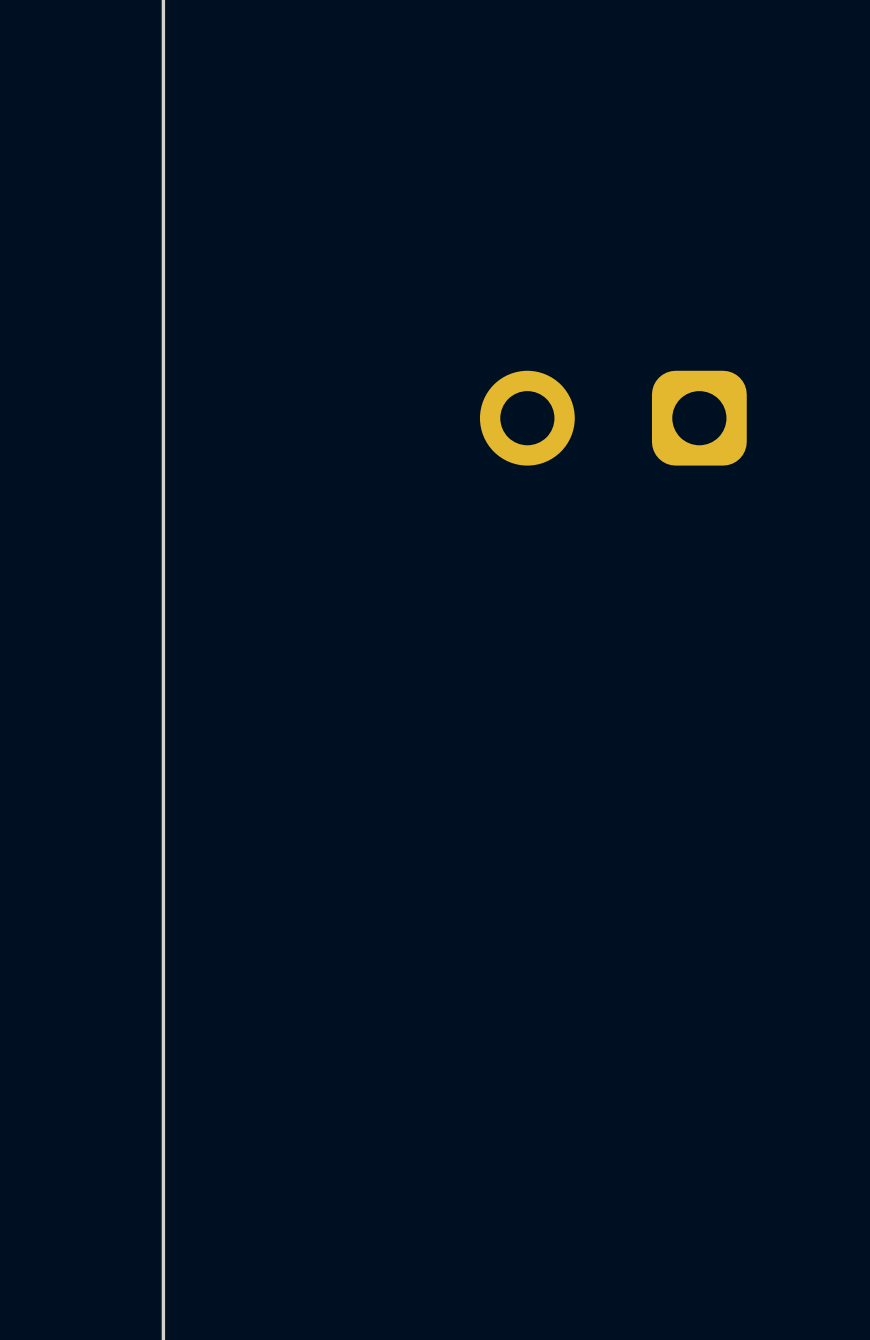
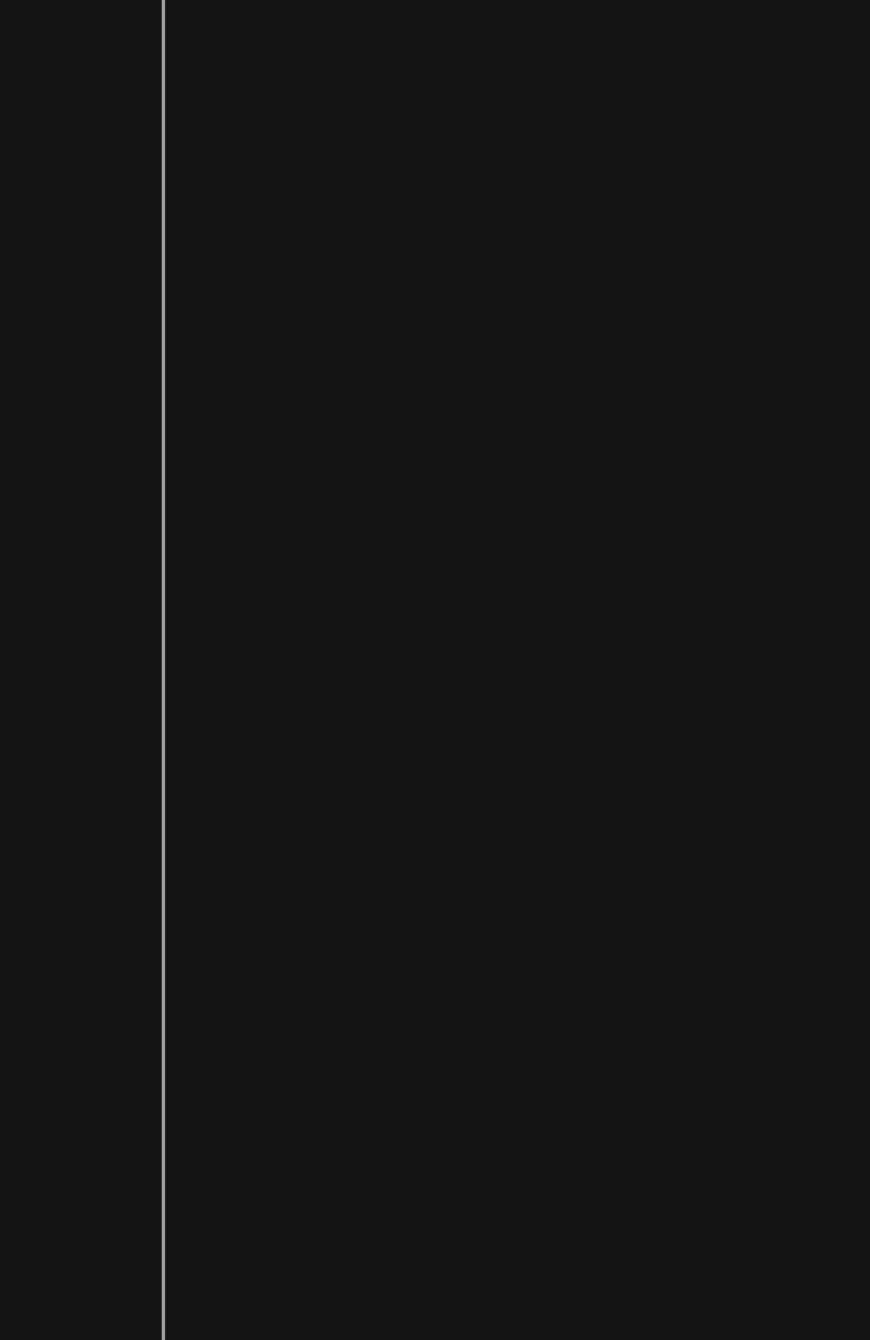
part: (613, 418) -> none

